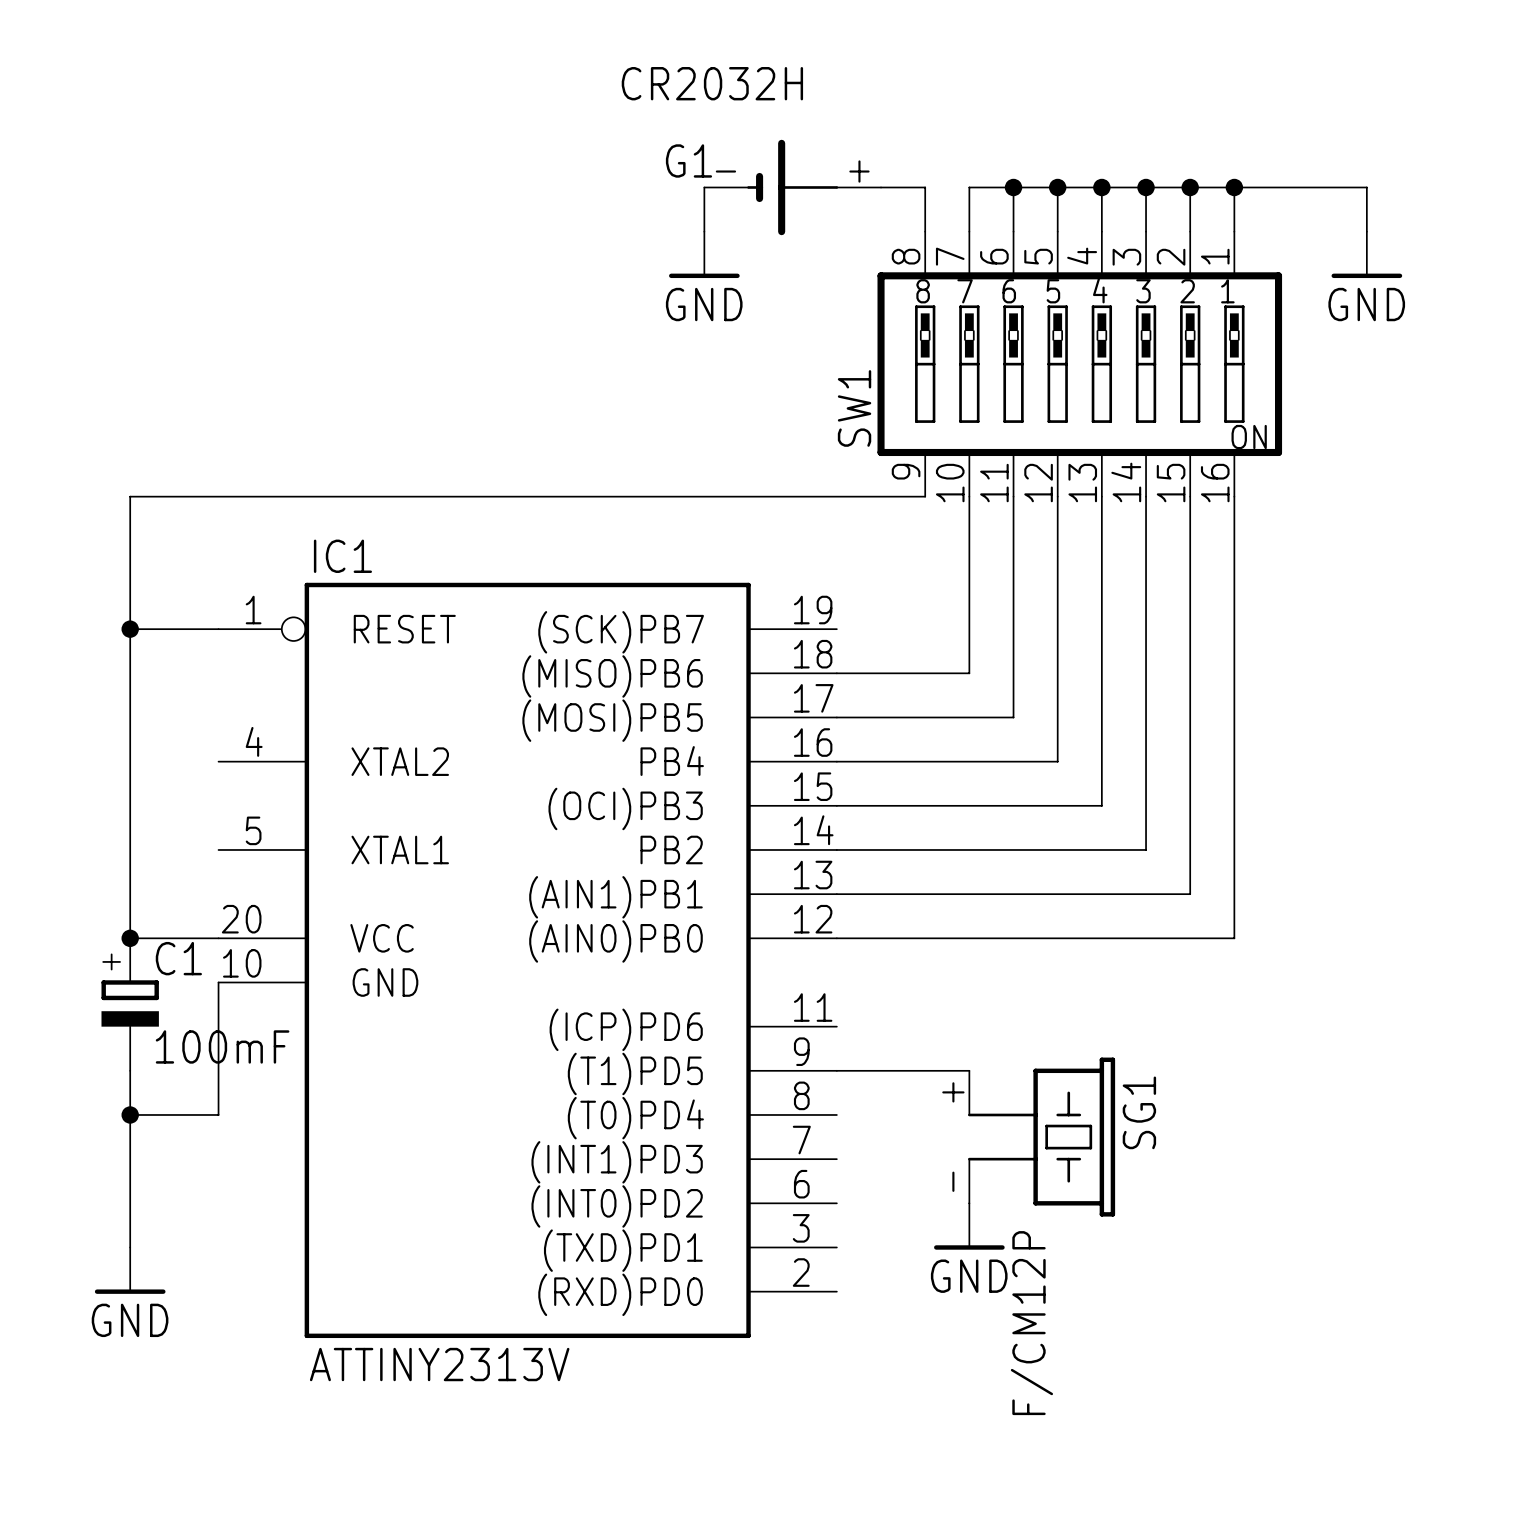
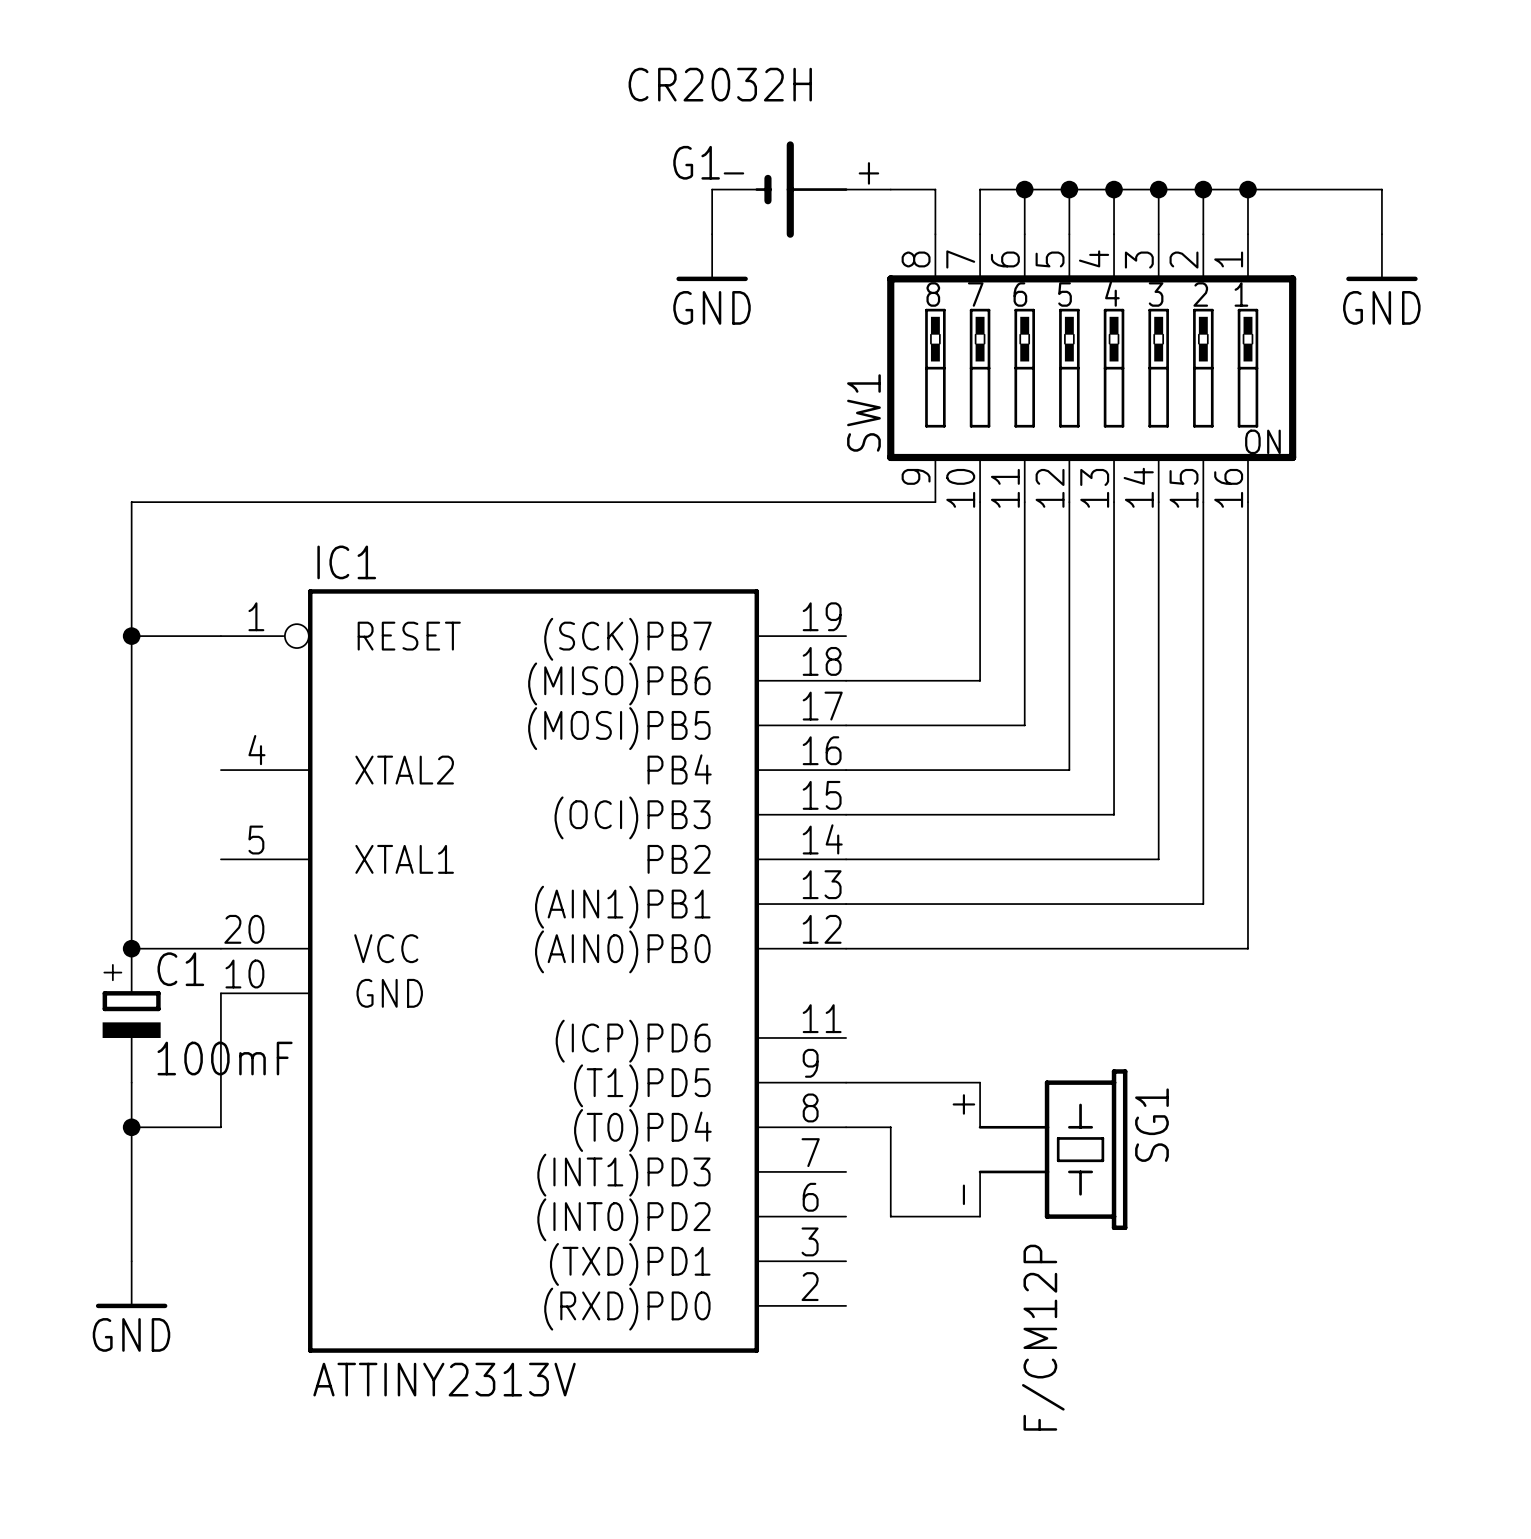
wire: none -> (846, 1127) (890, 1127) (890, 1216) (980, 1216)
power symbol: GND (969, 1226) -> none

